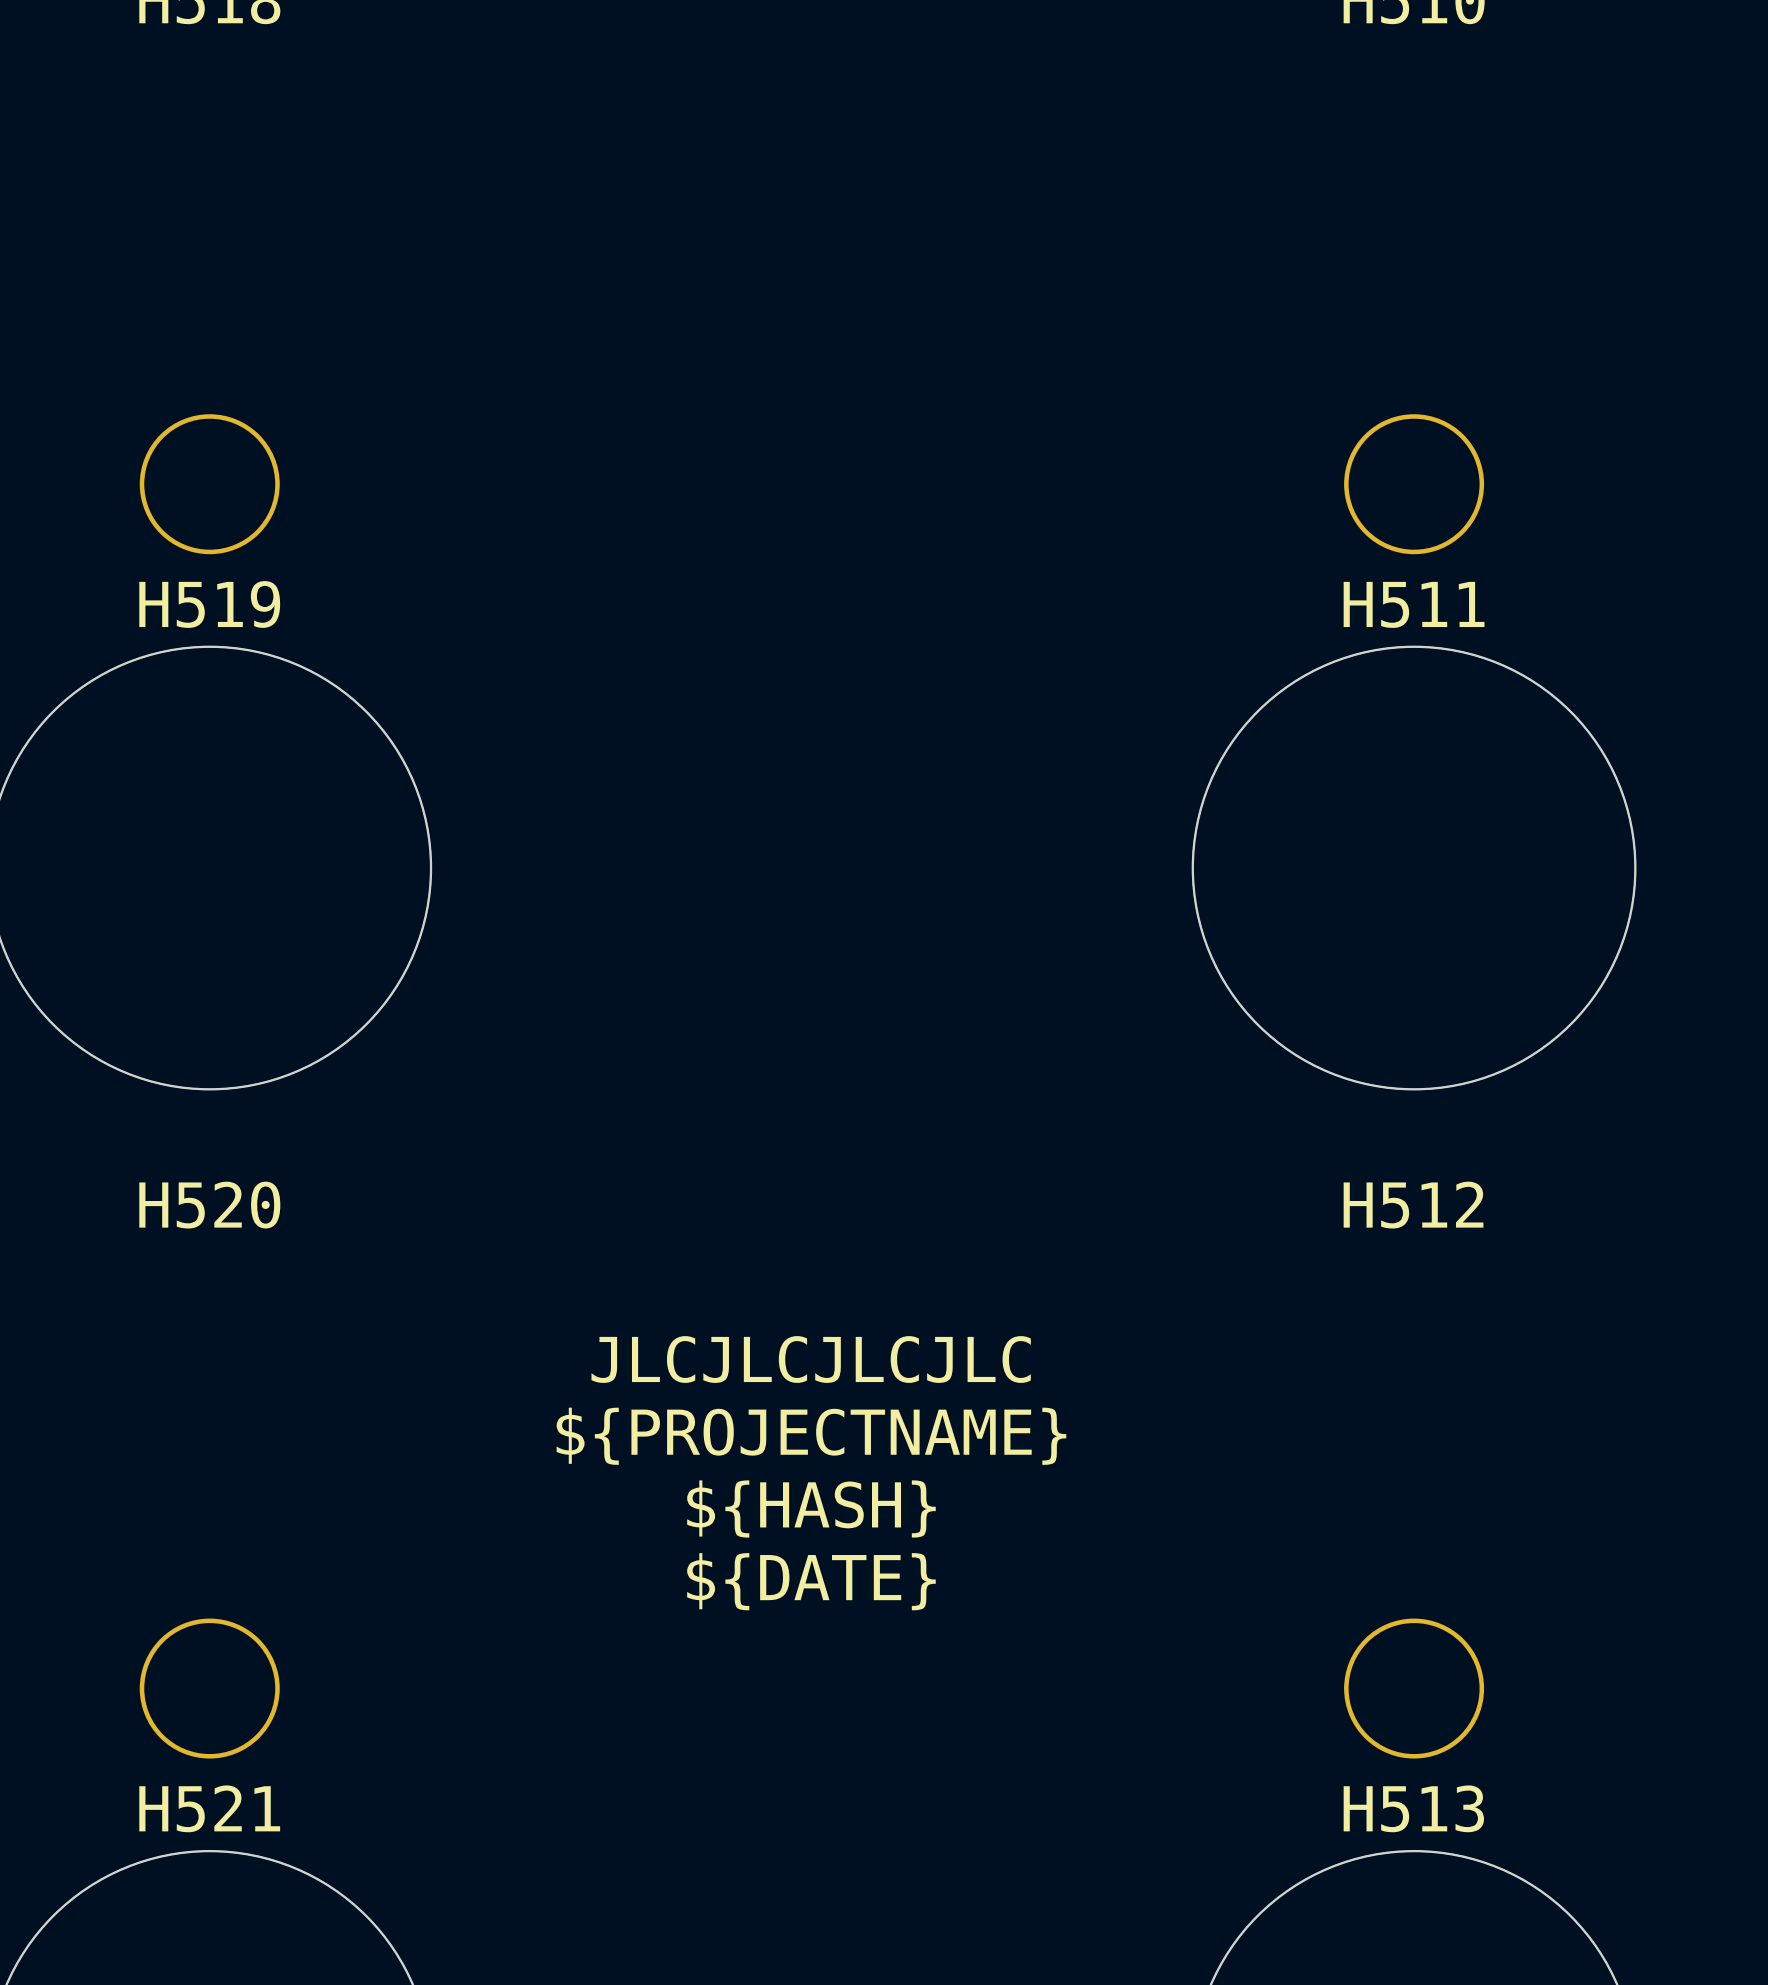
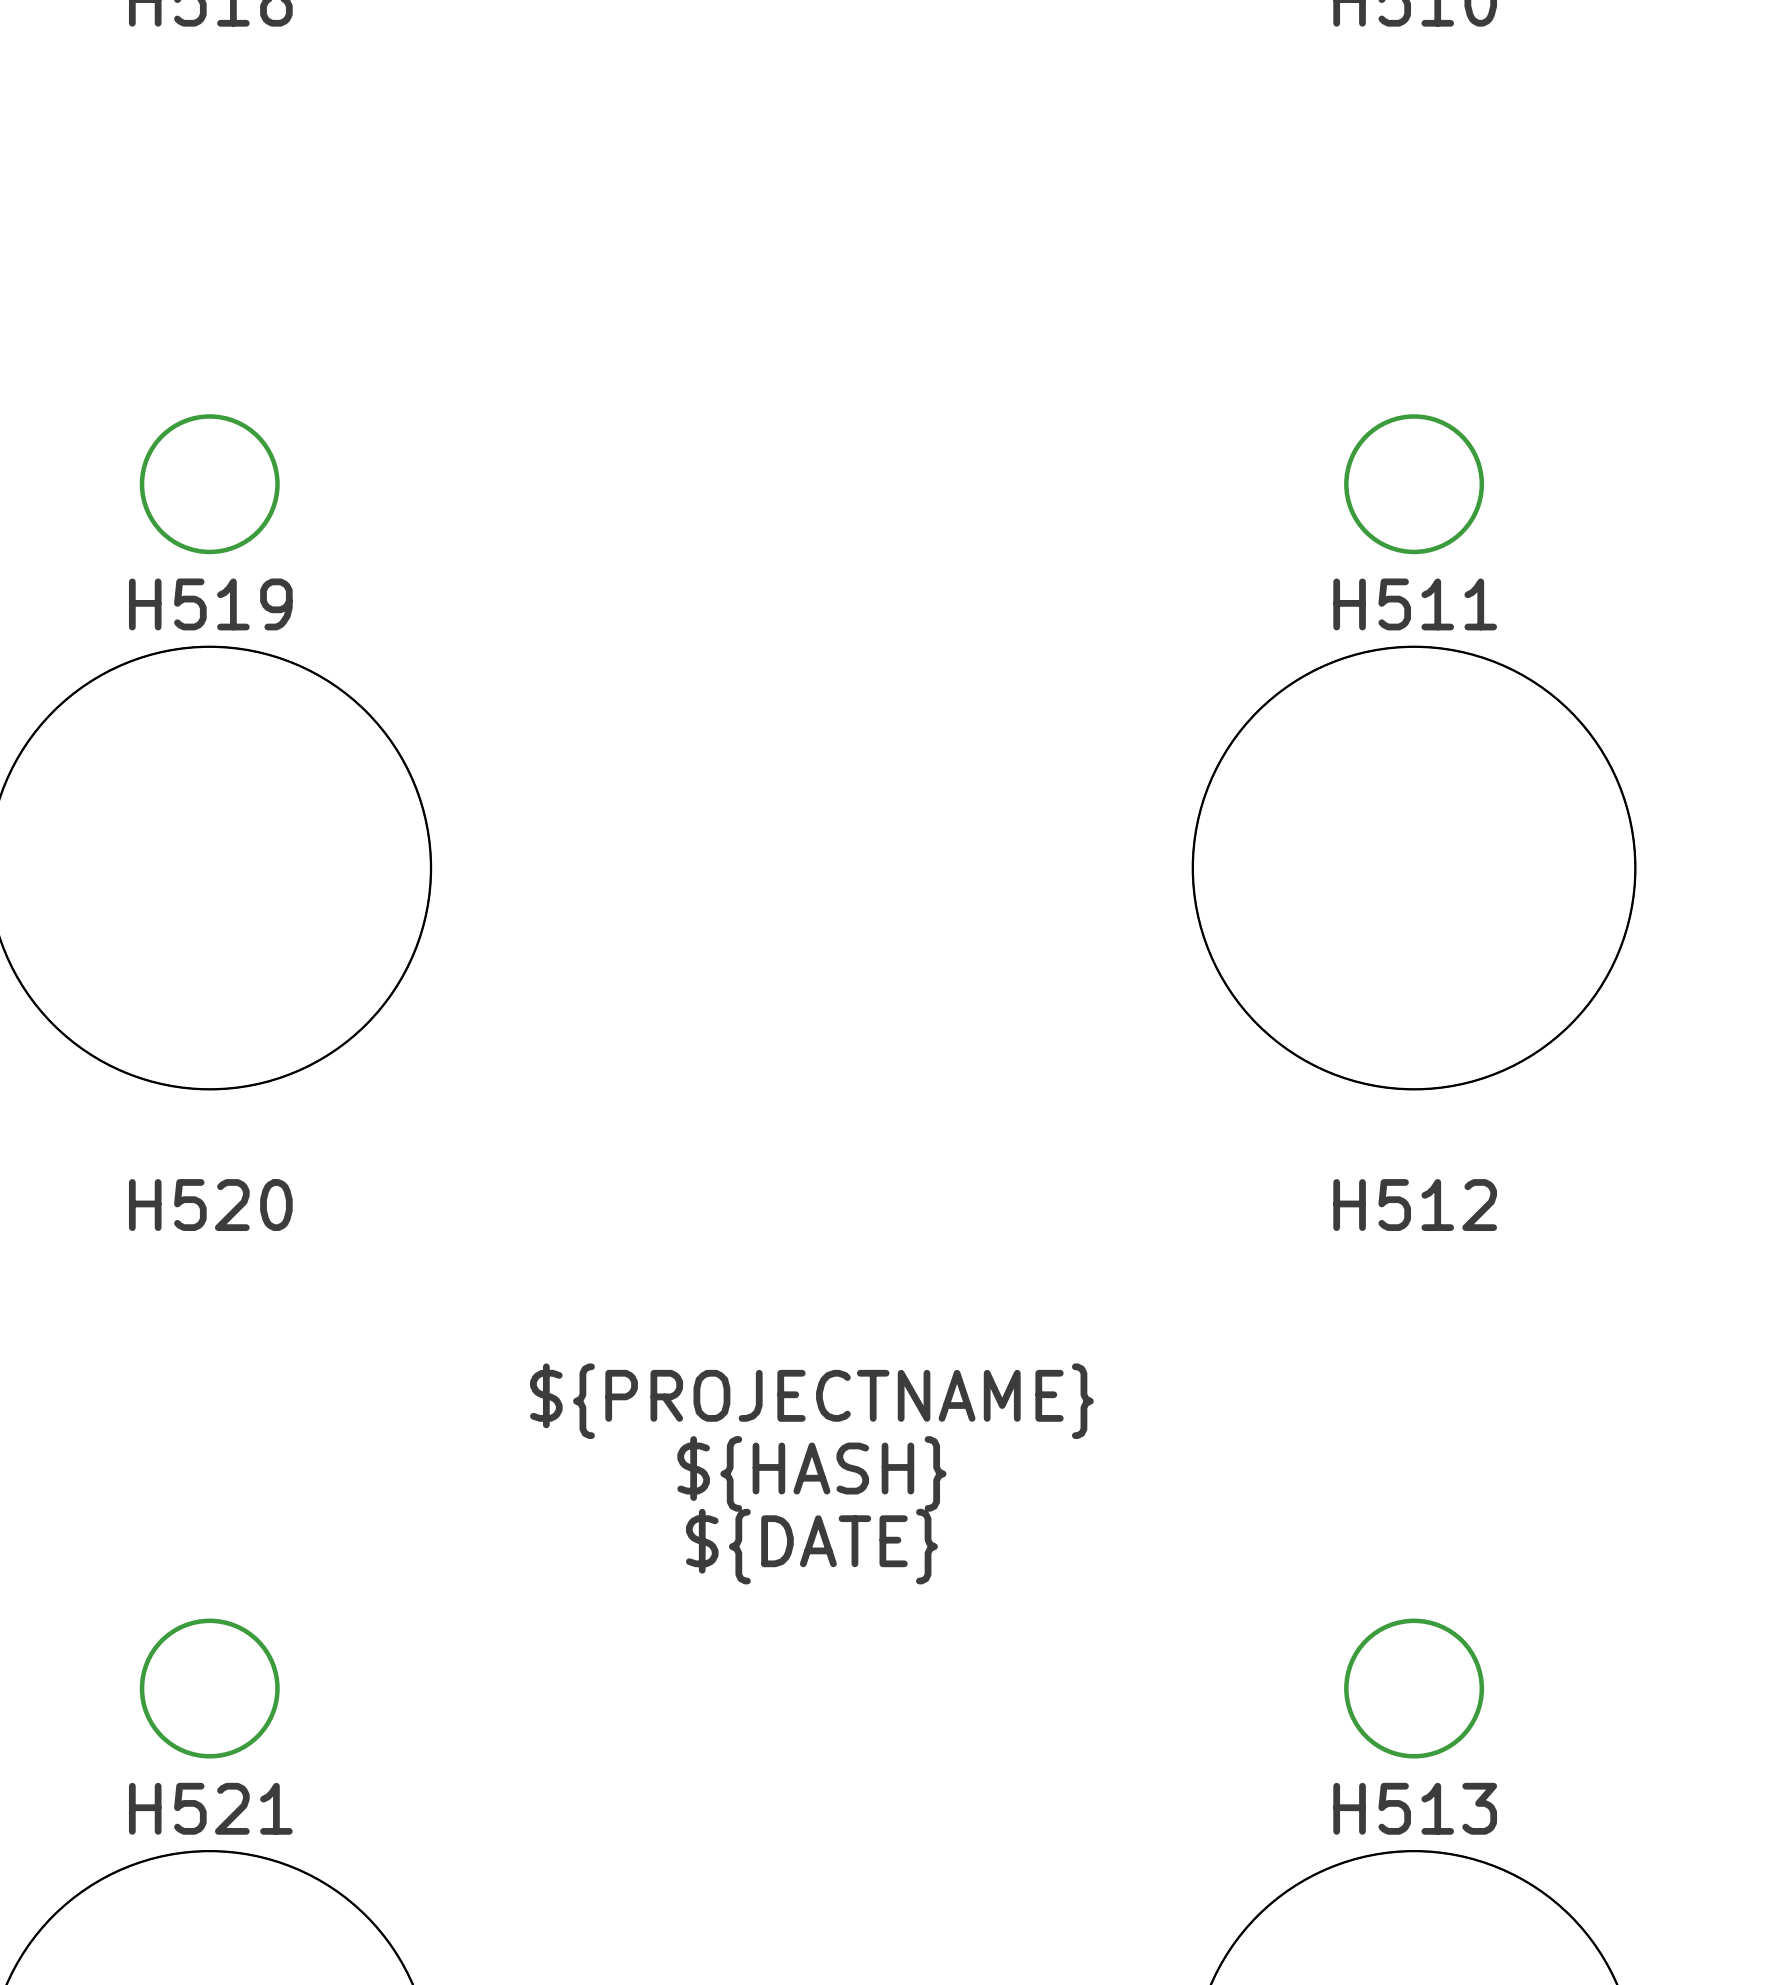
text: JLCJLCJLCJLC (811, 1359) -> none
text position: ${PROJECTNAME} (811, 1436) -> ${PROJECTNAME} (811, 1401)
text position: ${HASH} (811, 1508) -> ${HASH} (811, 1473)
text position: ${DATE} (811, 1581) -> ${DATE} (811, 1546)

